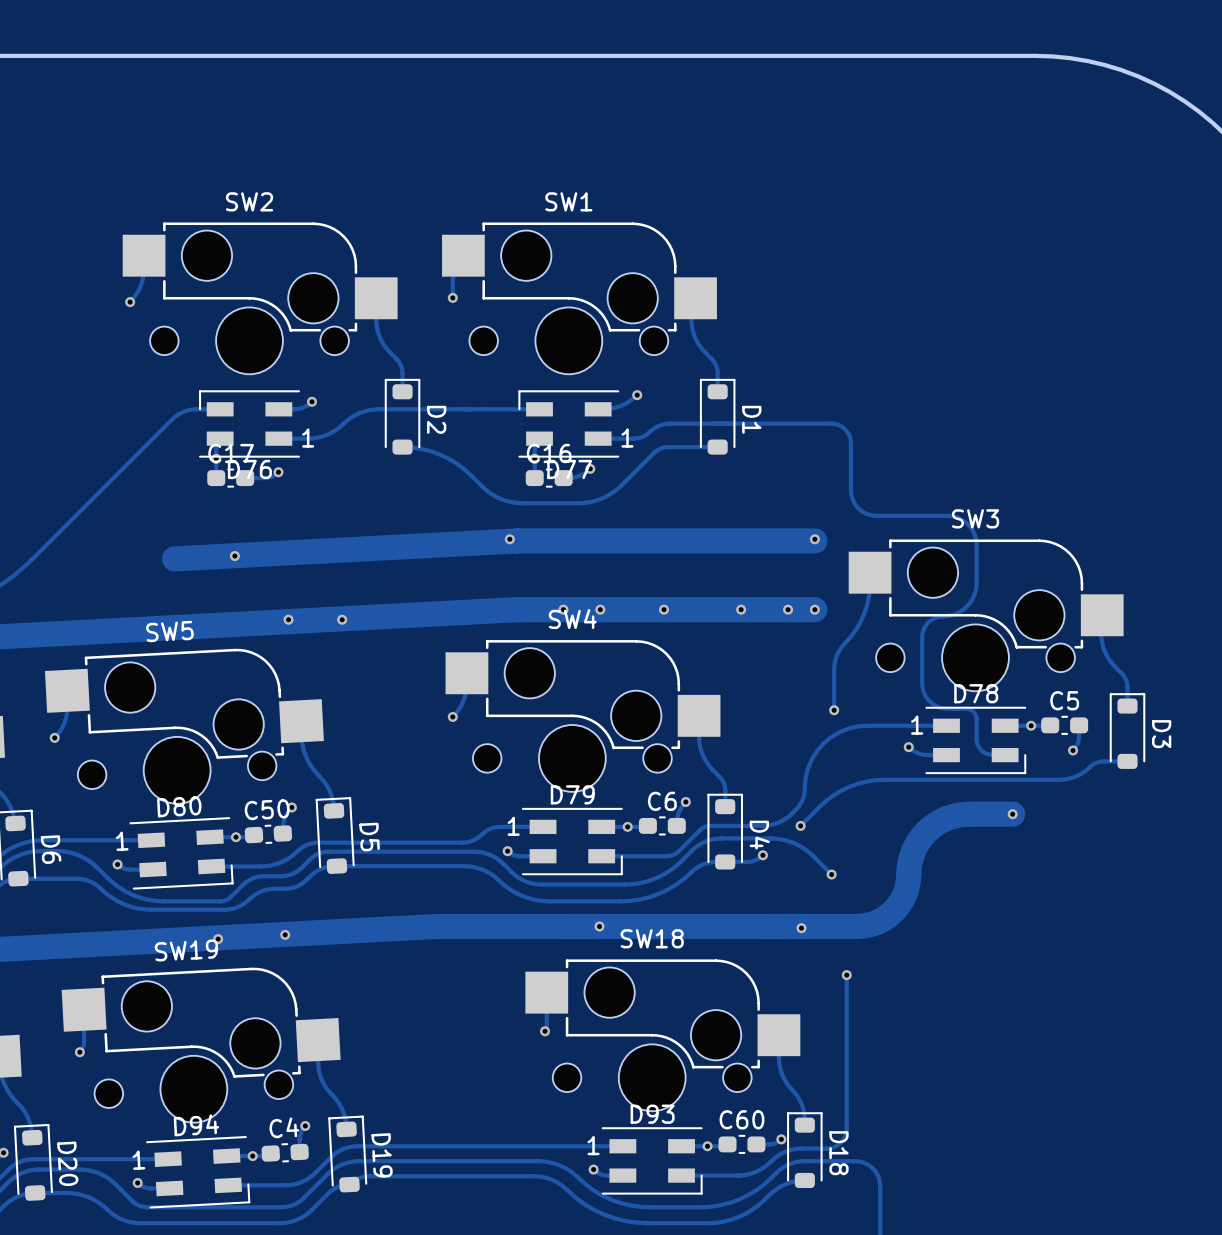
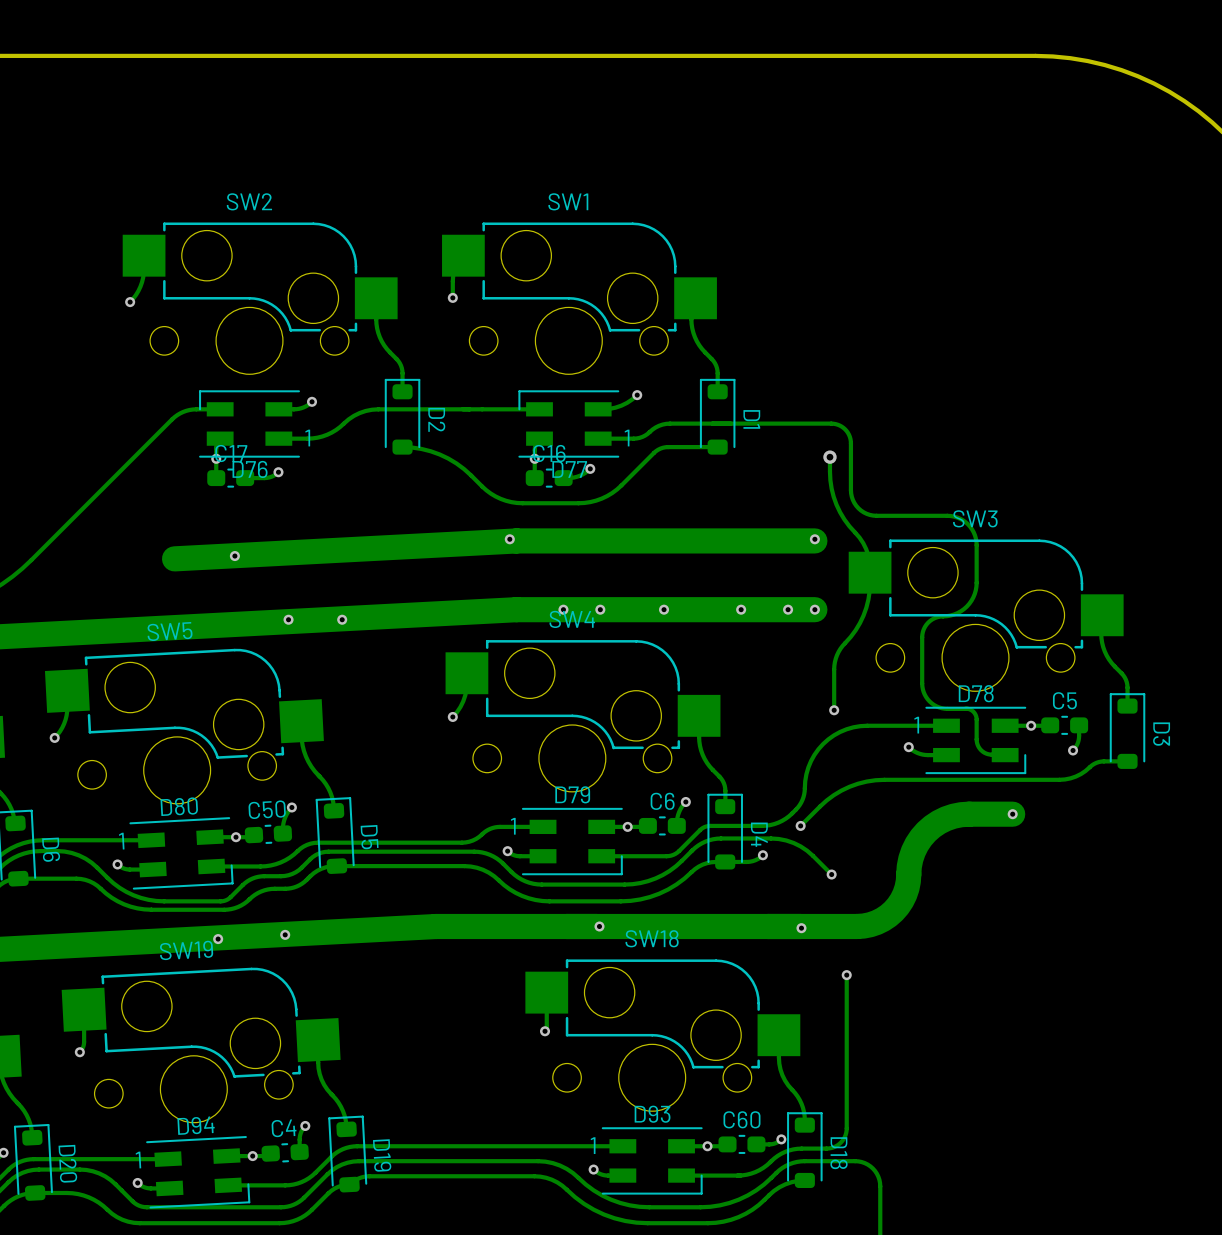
track: none -> (829, 457) (830, 480) (833, 496) (844, 519) (866, 549) (870, 572)
via: none -> (829, 457)

